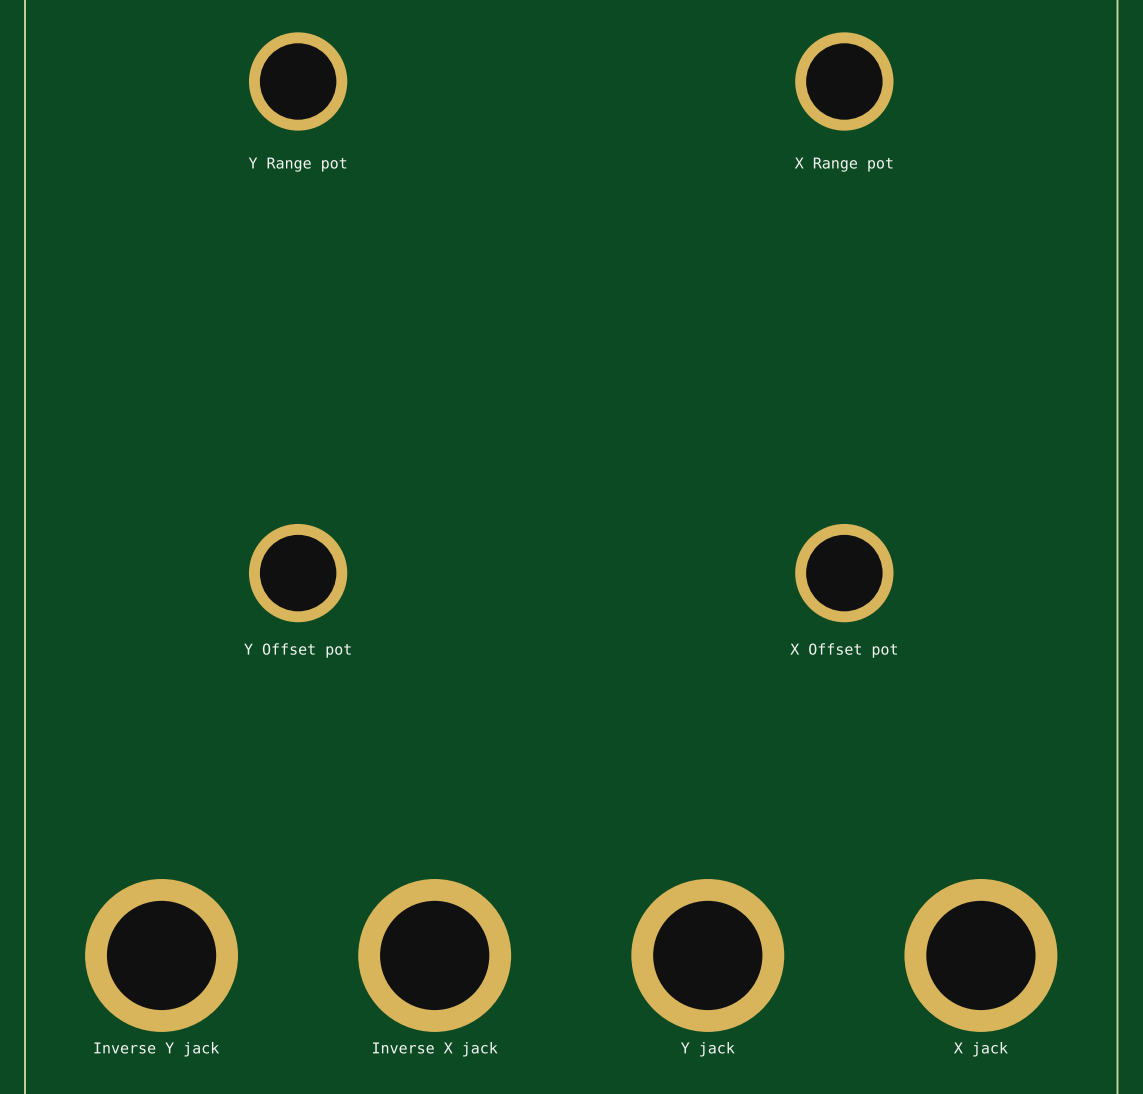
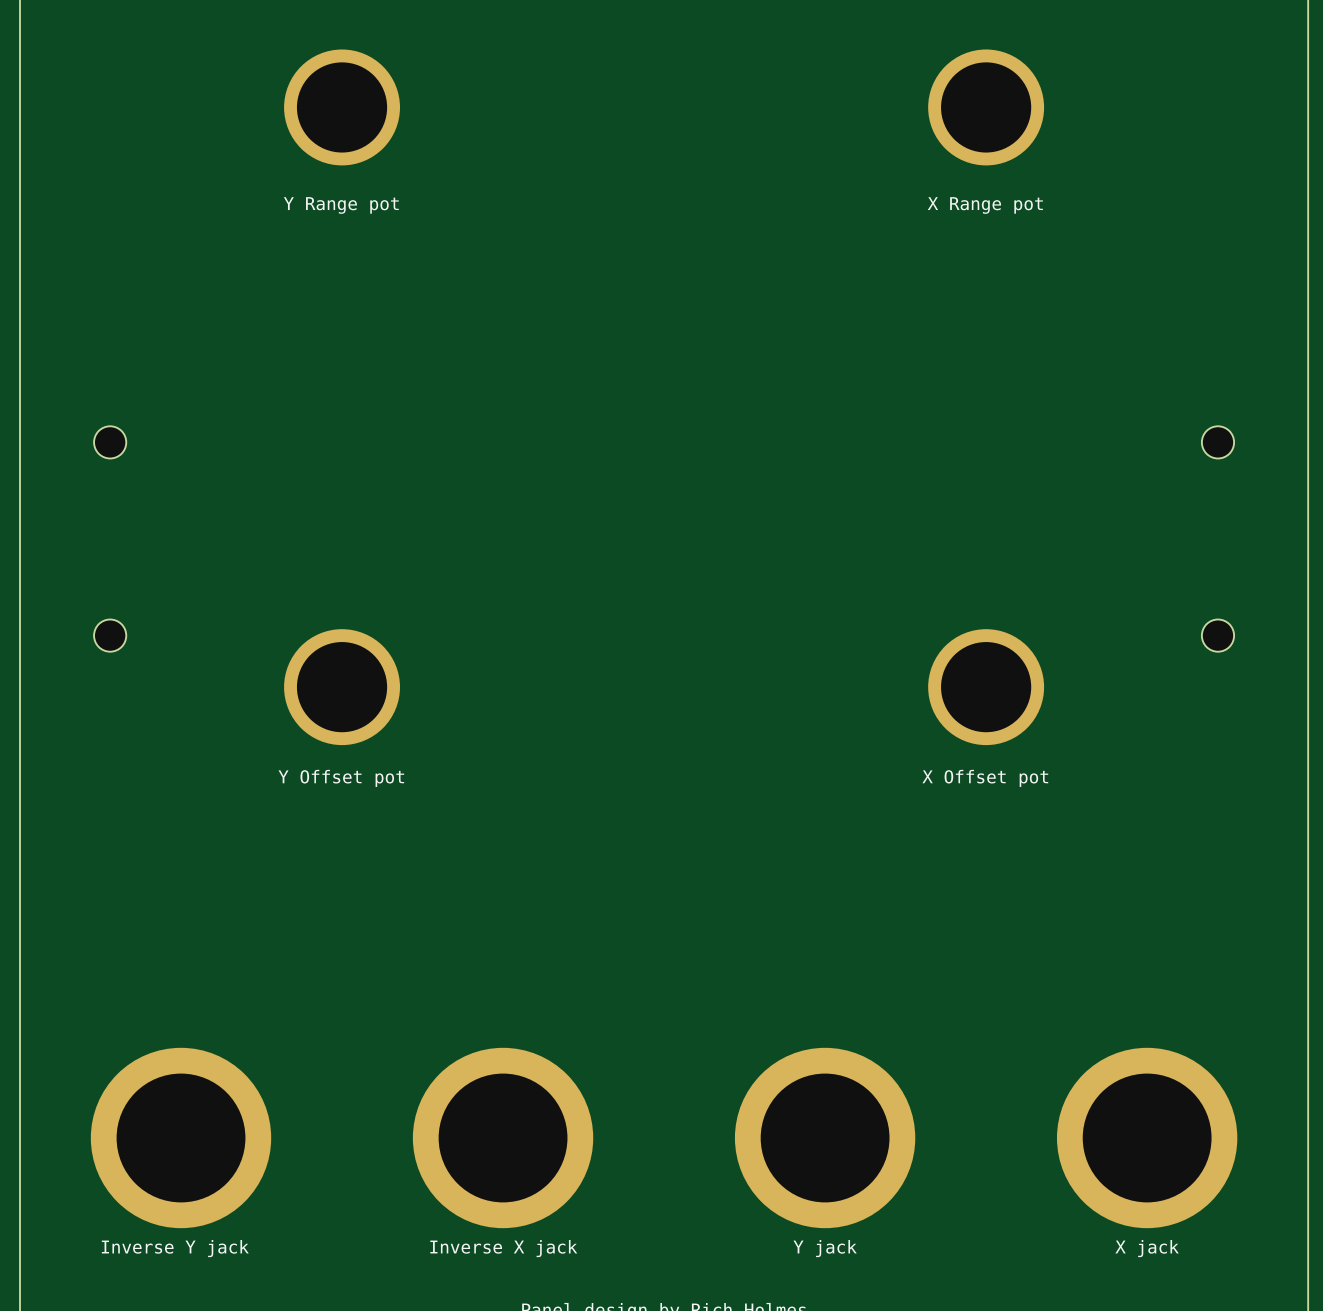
part: none -> (110, 442)
part: none -> (1217, 442)
part: none -> (110, 635)
part: none -> (1217, 635)

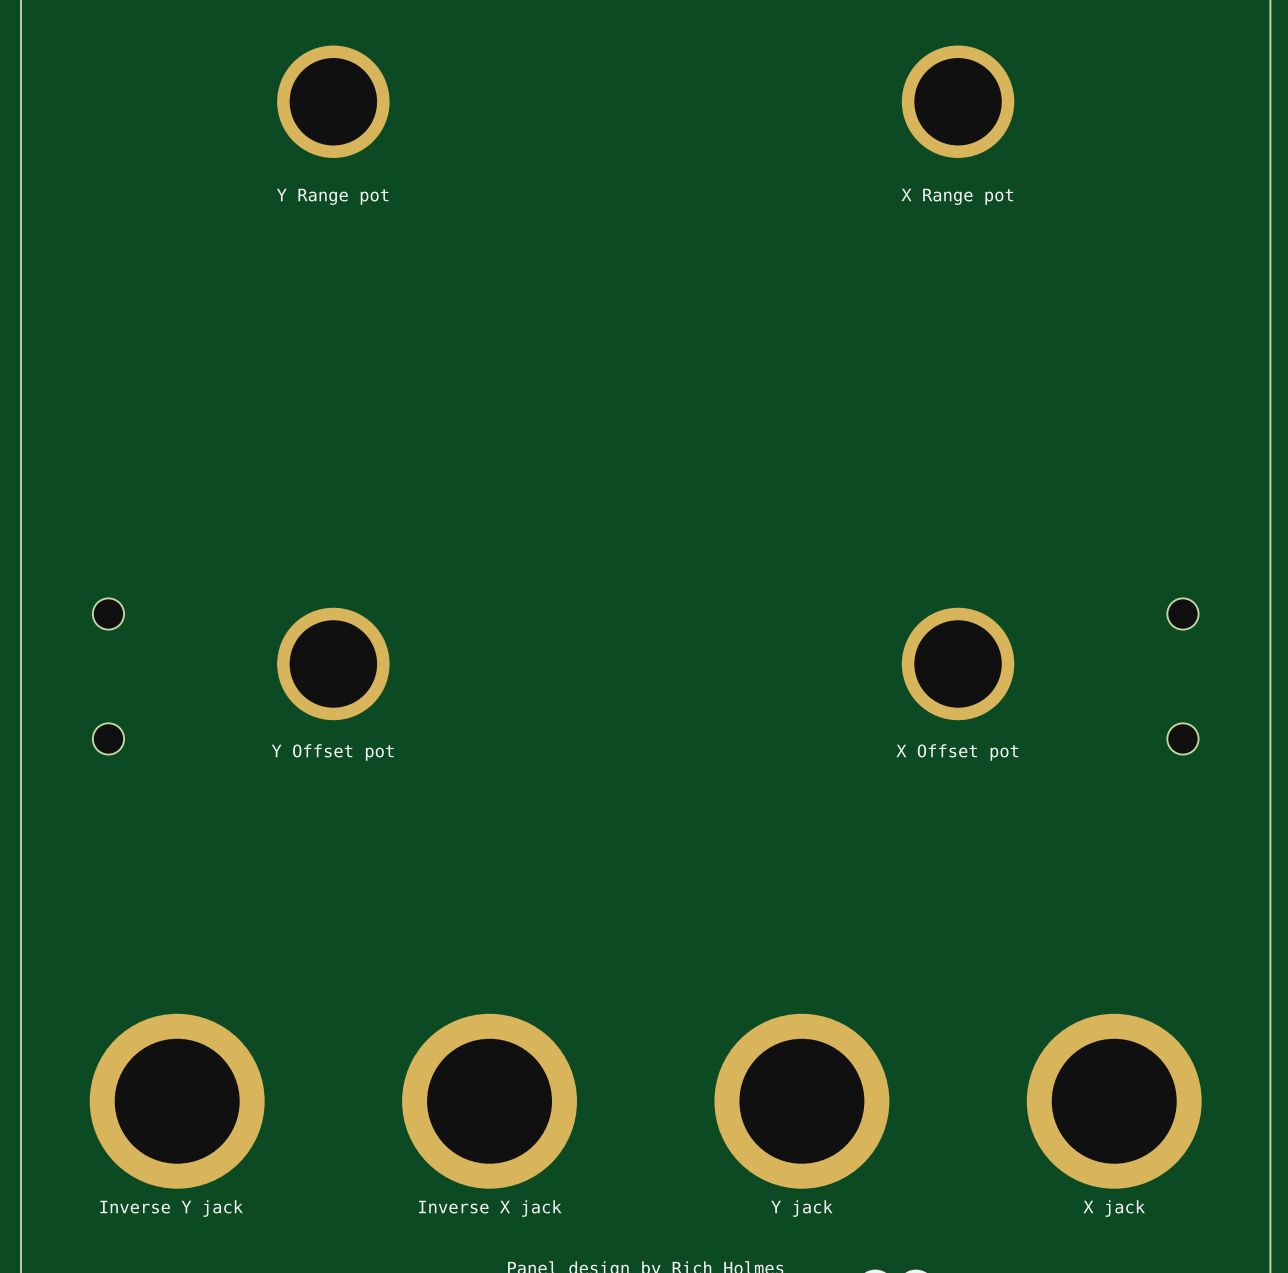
part position: (110, 442) -> (108, 738)
part position: (1217, 442) -> (1182, 738)

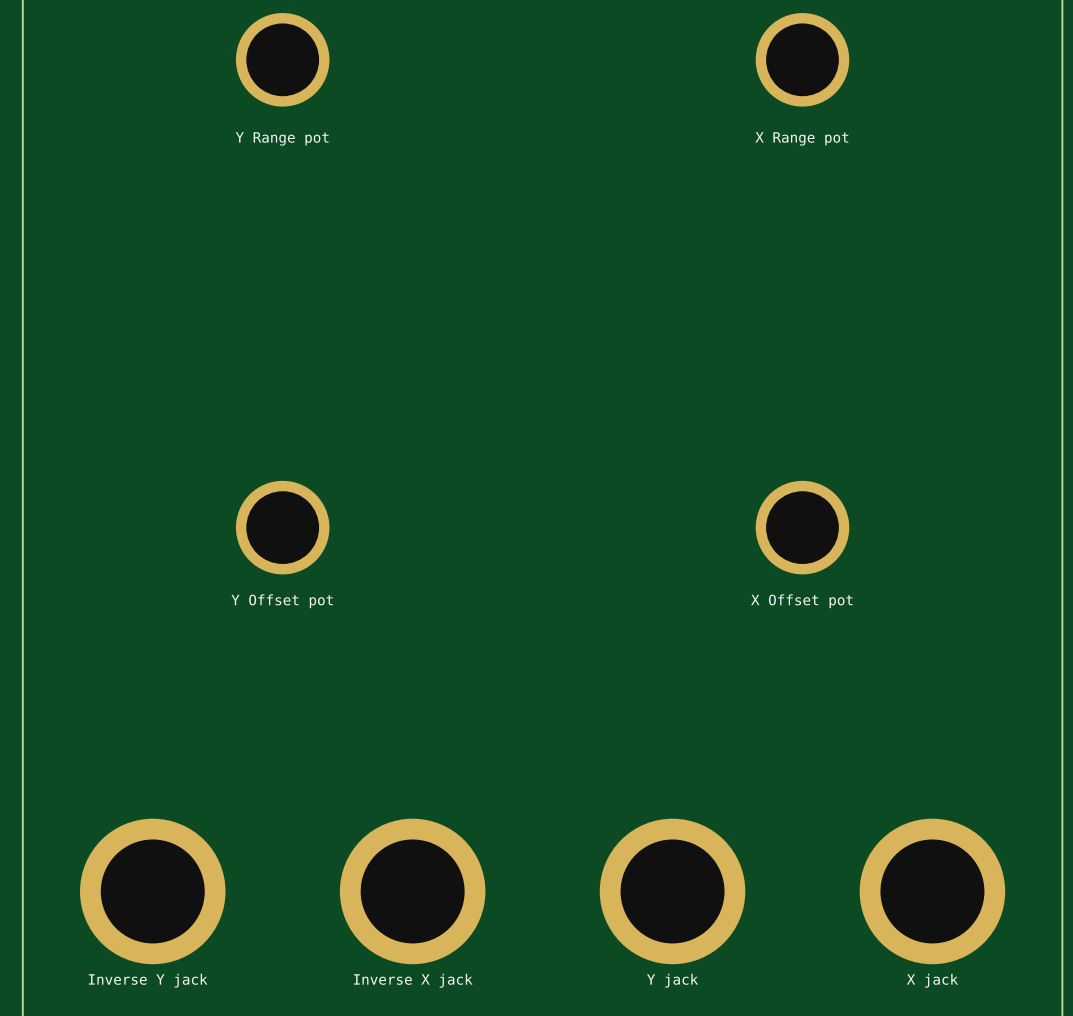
part: (108, 614) -> none
part: (1182, 614) -> none
part: (108, 738) -> none
part: (1182, 738) -> none

